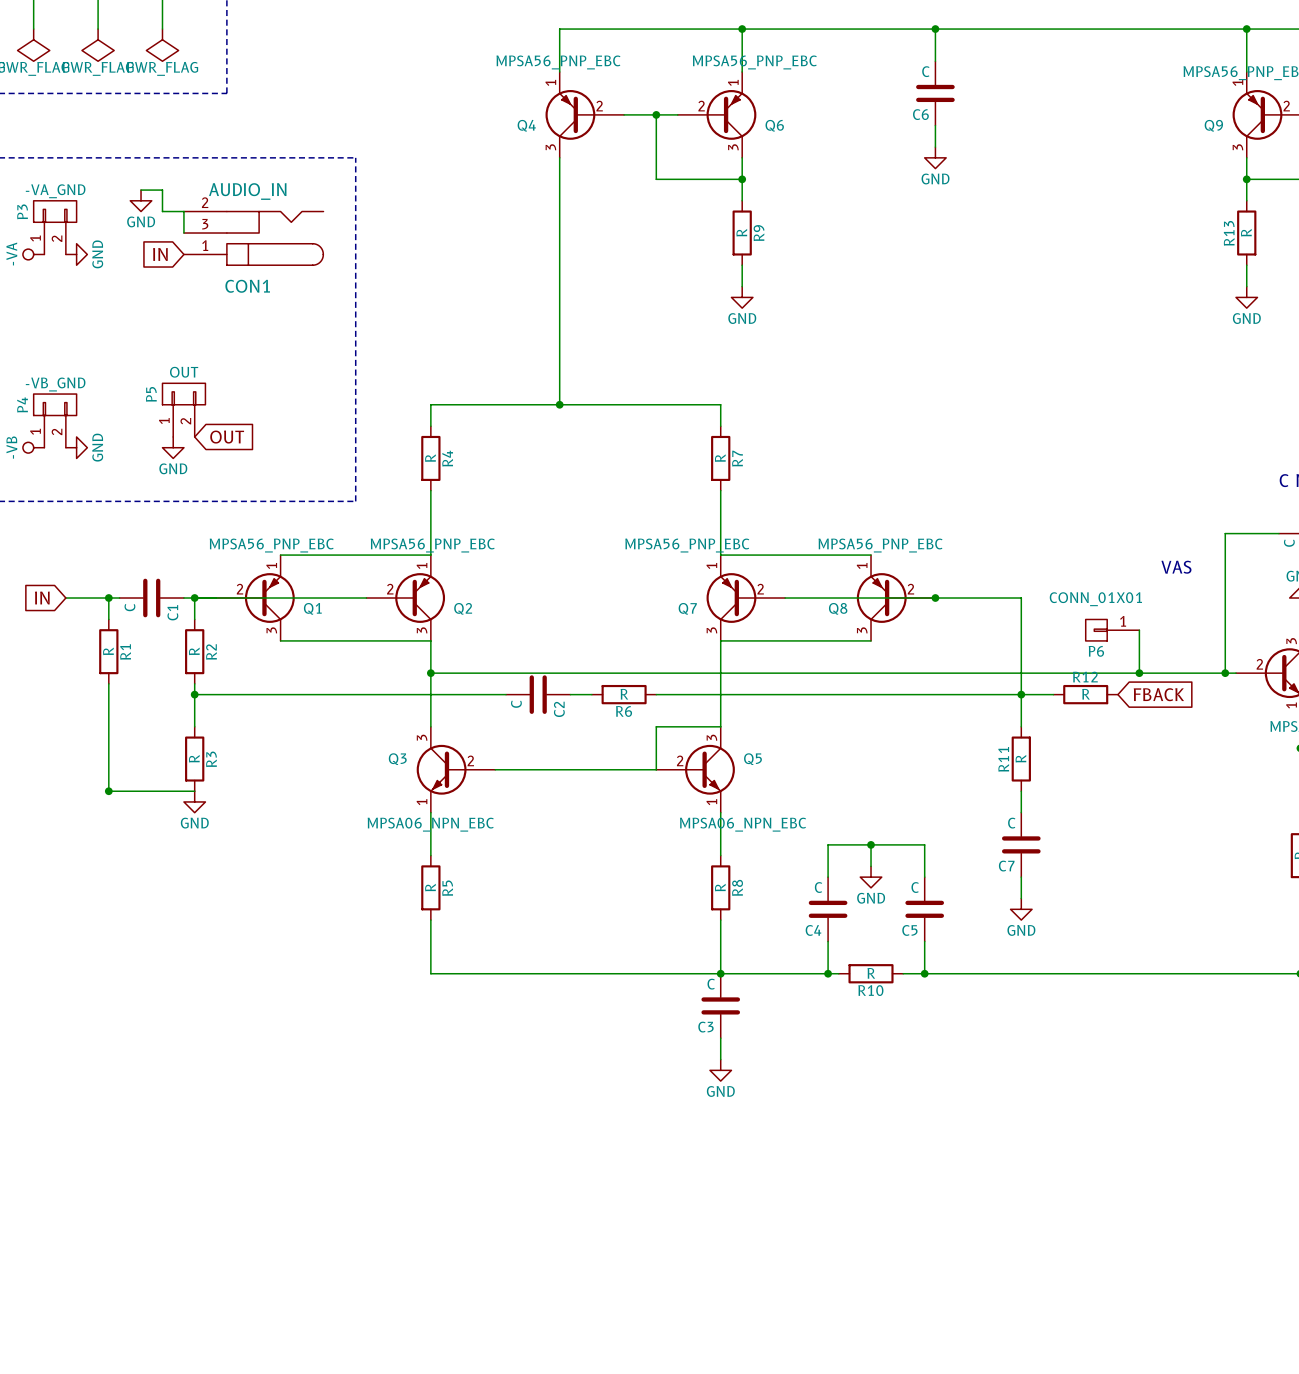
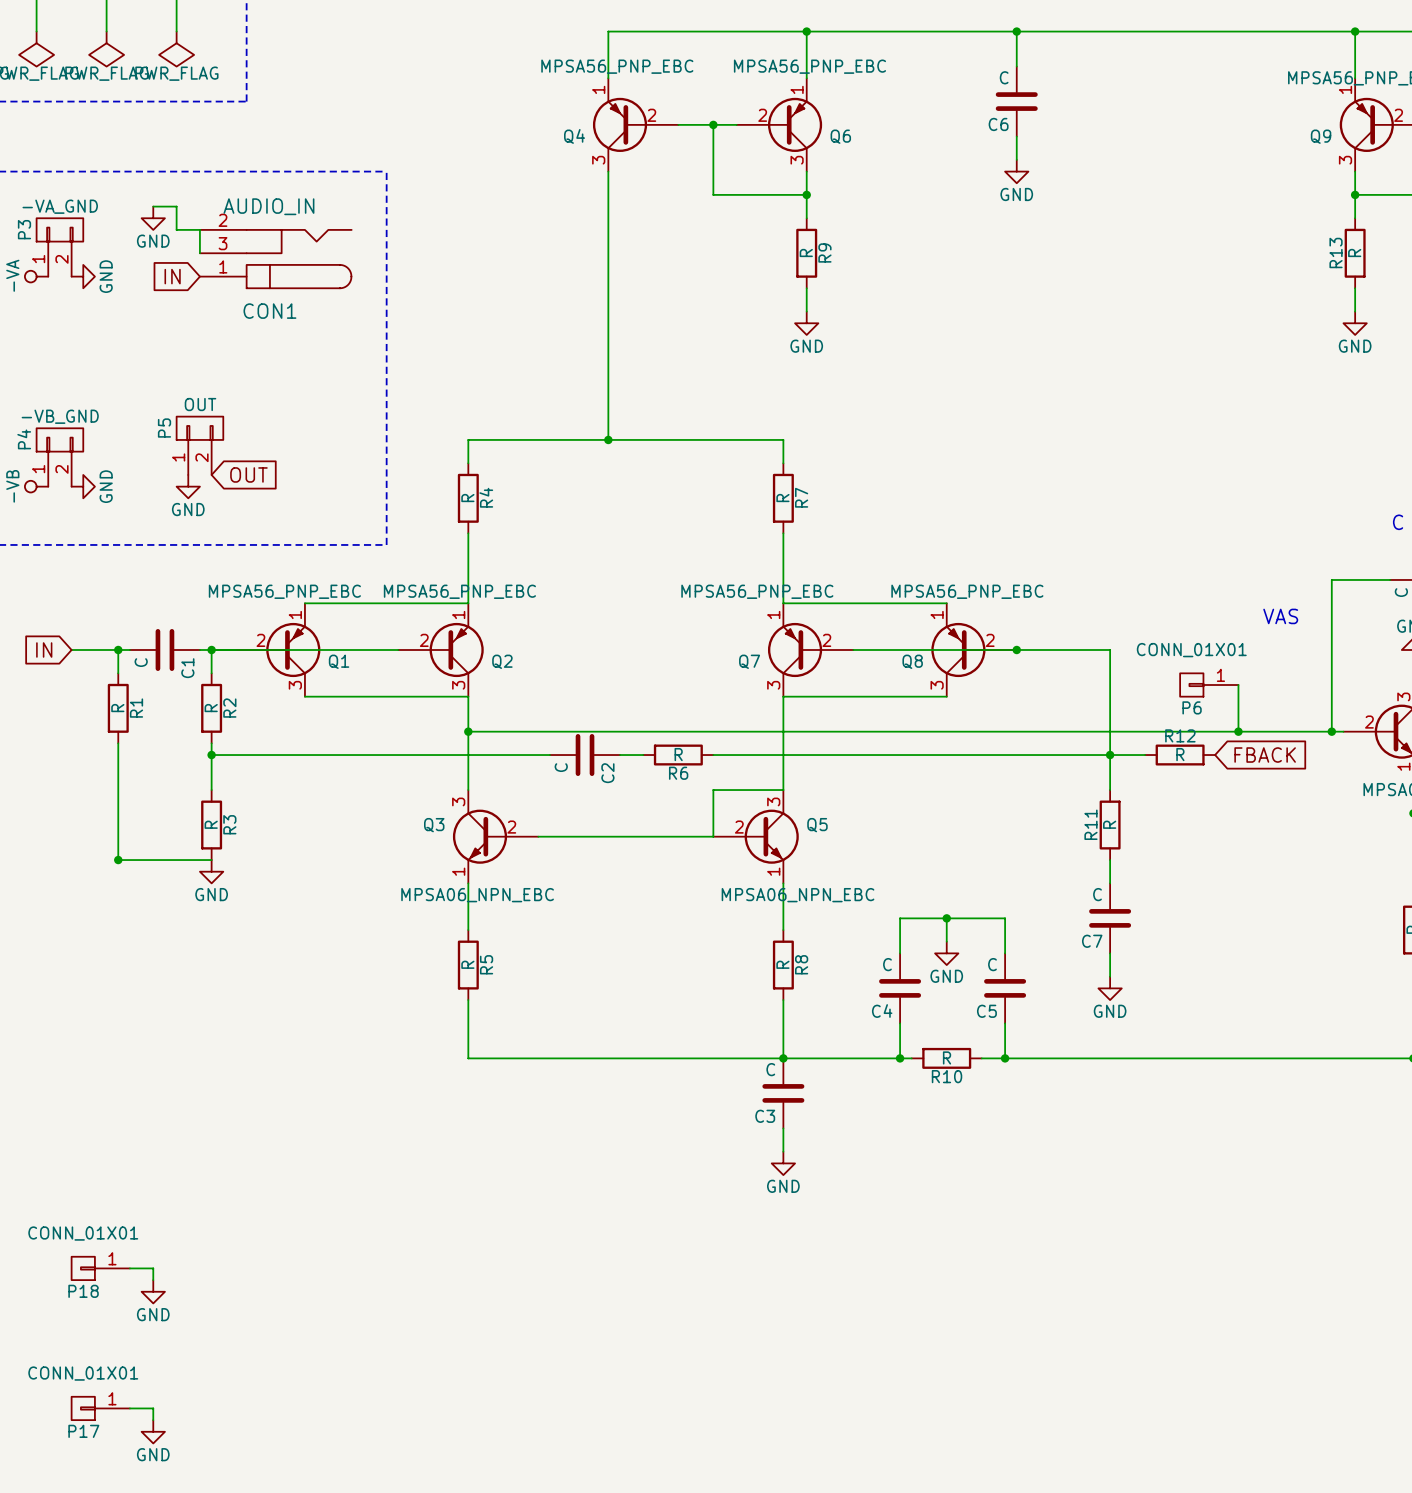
P18: none -> CONN_01X01 (100, 1268)
wire: none -> (129, 1268) (153, 1268) (153, 1280)
power symbol: none -> GND (153, 1291)
P17: none -> CONN_01X01 (100, 1408)
wire: none -> (129, 1408) (153, 1408) (153, 1420)
power symbol: none -> GND (153, 1431)

